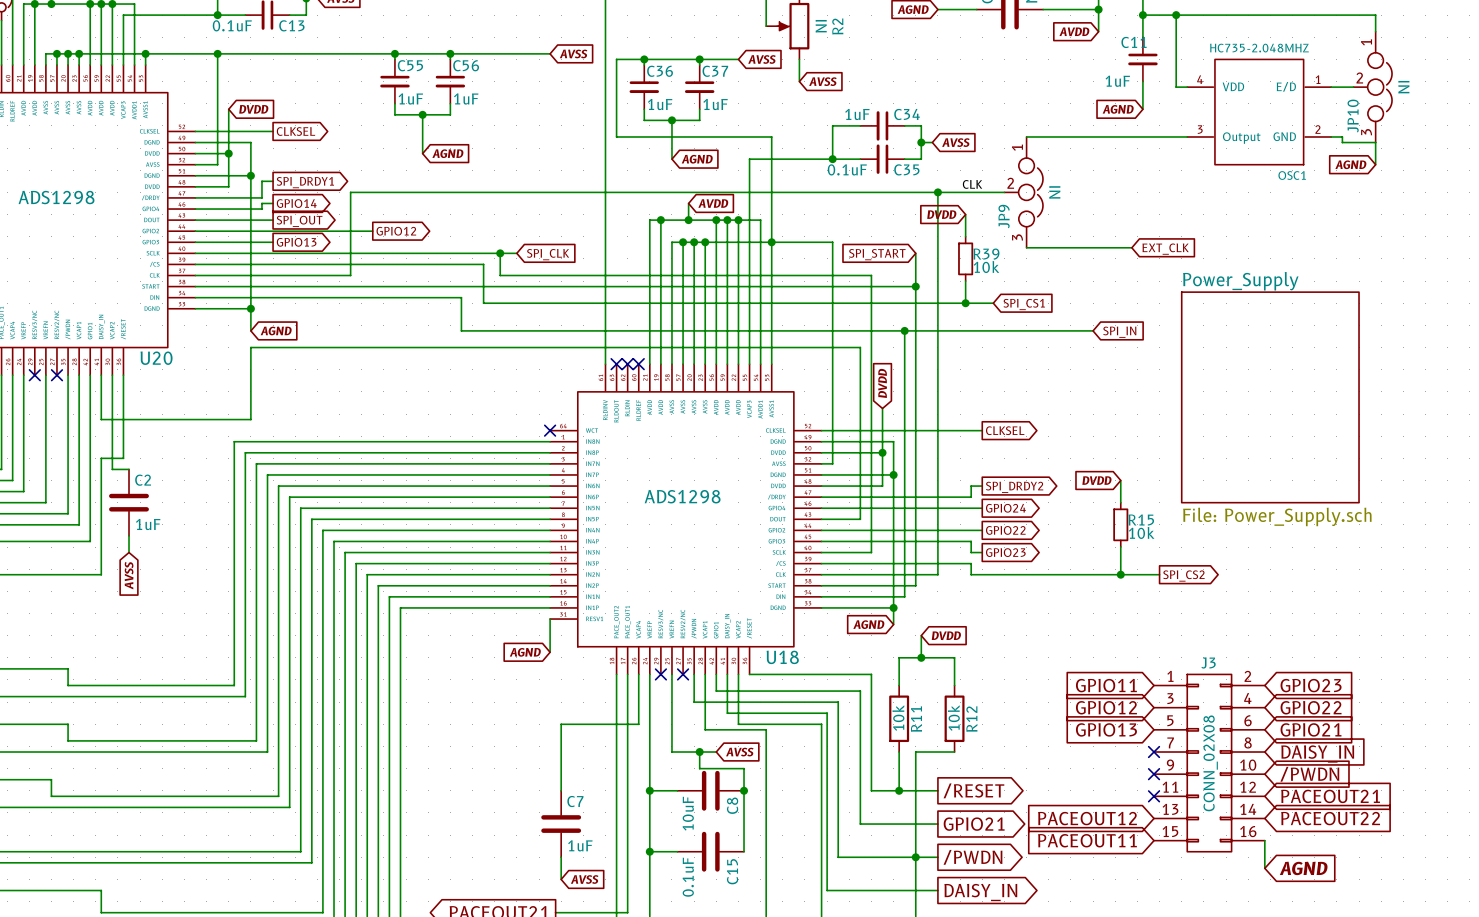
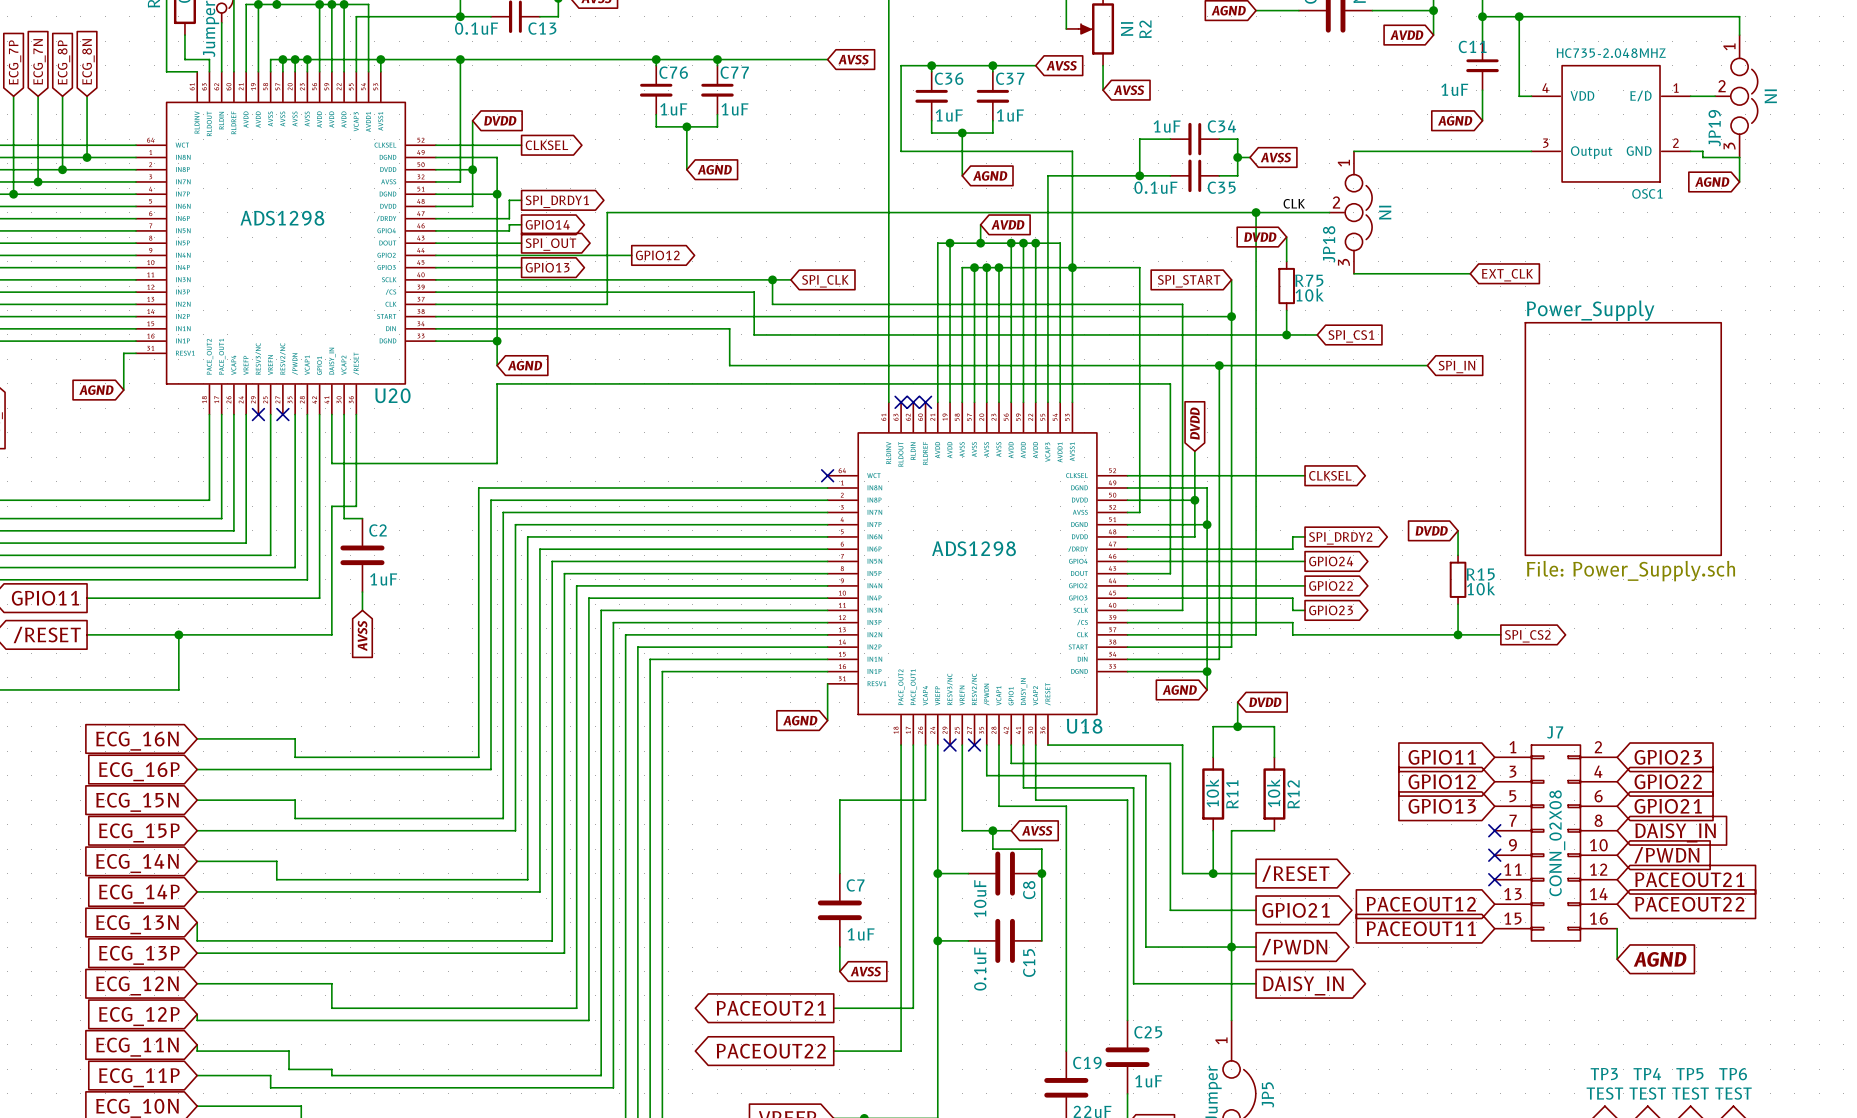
C55 name: C55 (410, 65) -> C76 (673, 72)
C56 name: C56 (466, 65) -> C77 (734, 72)
JP10 name: JP10 (1353, 116) -> JP19 (1714, 128)
JP9 name: JP9 (1004, 216) -> JP18 (1329, 244)
R39 name: R39 (986, 254) -> R75 (1309, 280)
J3 name: J3 (1208, 663) -> J7 (1555, 732)

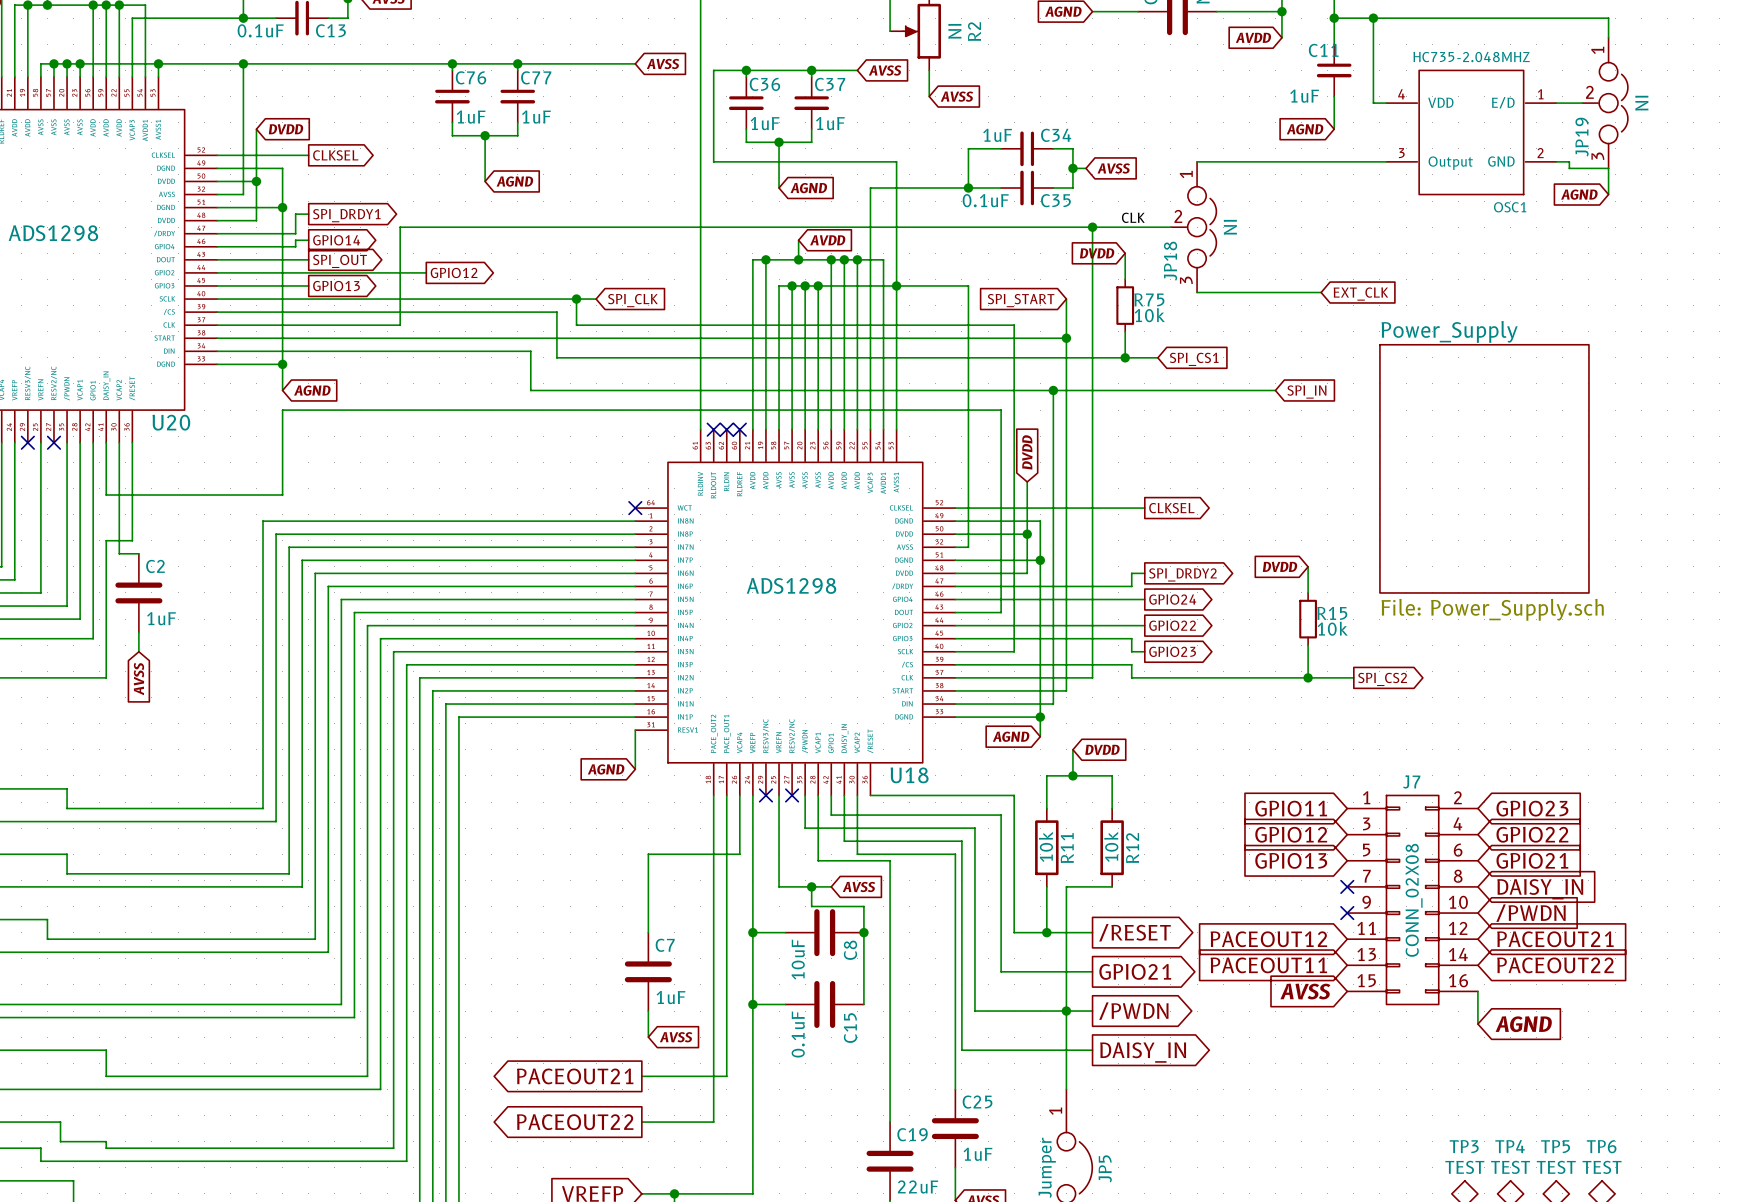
global label: none -> PACEOUT12 (1268, 939)
no-connect mark: (1494, 879) -> none
global label: PACEOUT12 (1421, 904) -> PACEOUT11 (1268, 965)
global label: PACEOUT11 (1421, 928) -> AVSS (1305, 991)

